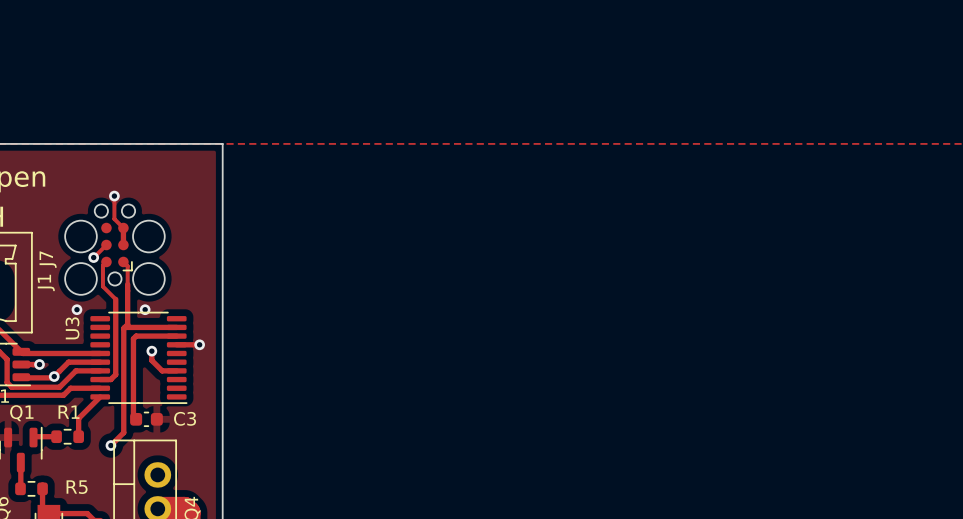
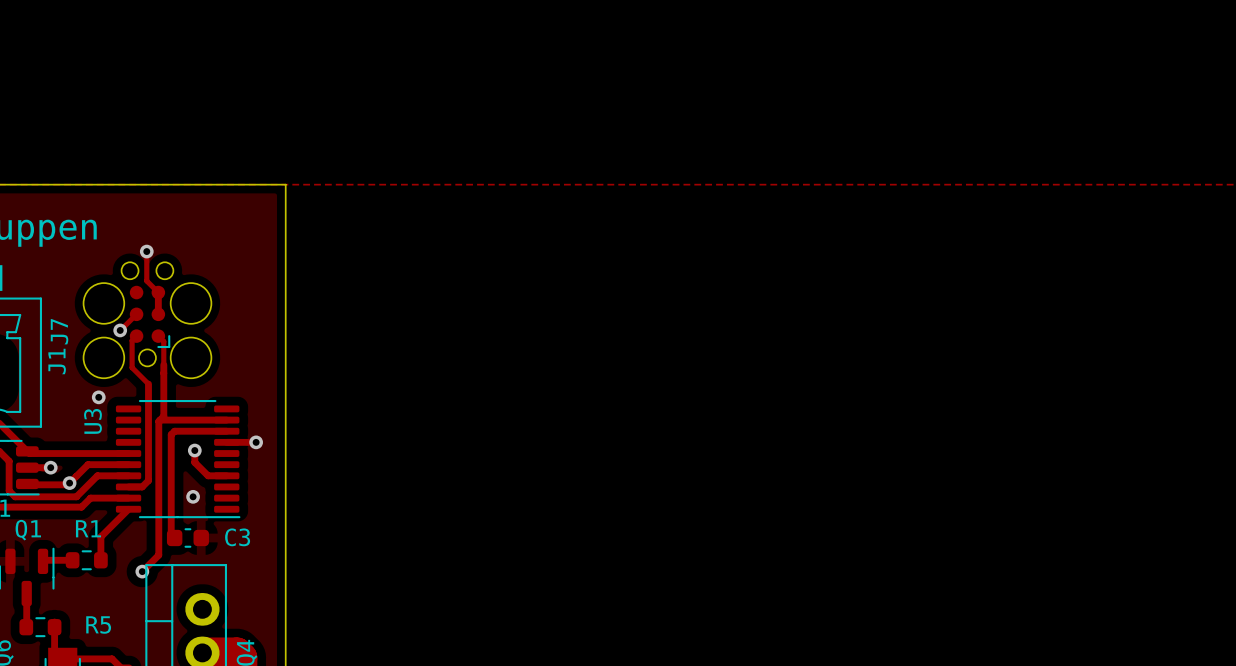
via position: (145, 309) -> (193, 496)

